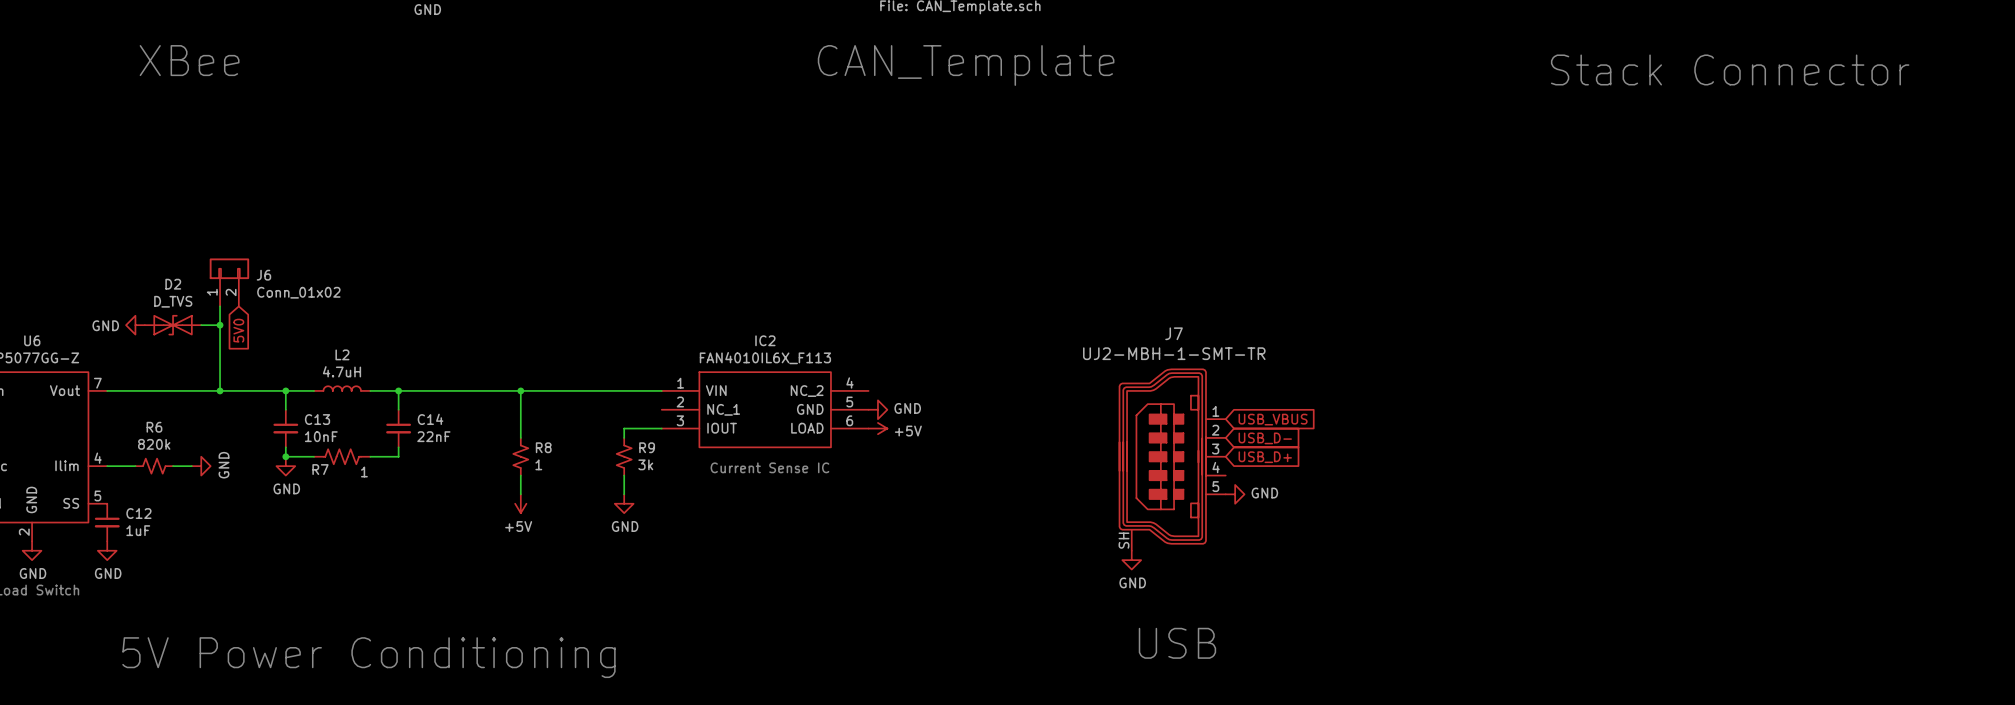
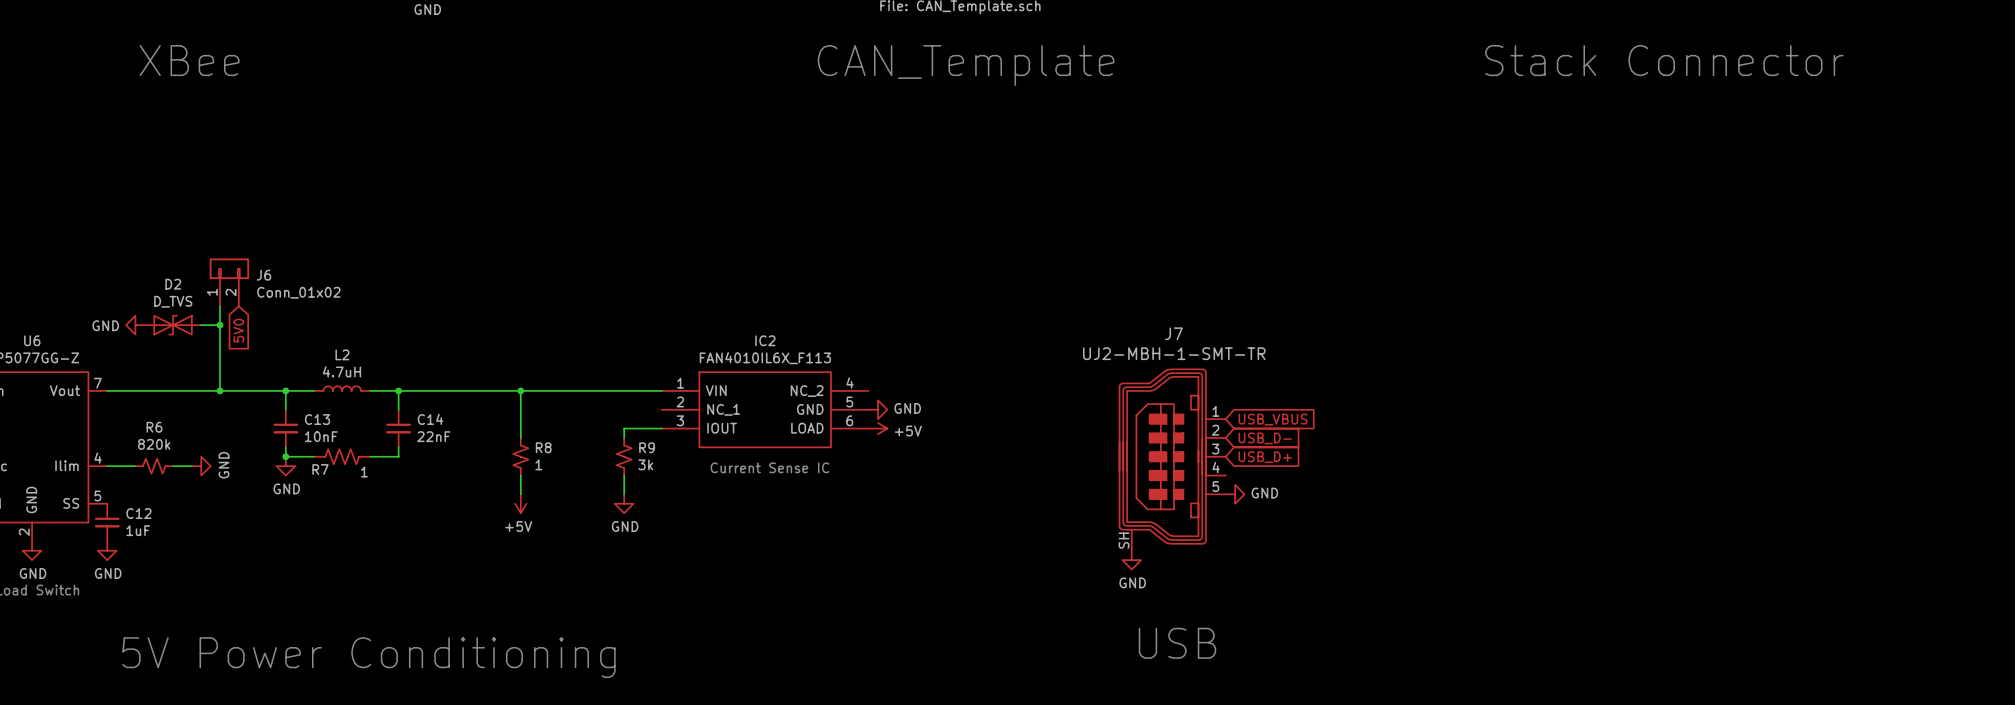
text position: Stack Connector (1730, 69) -> Stack Connector (1664, 60)

